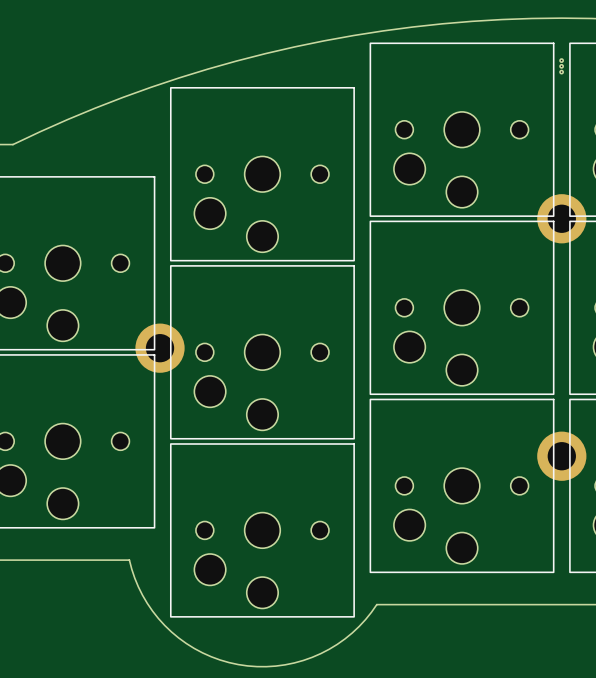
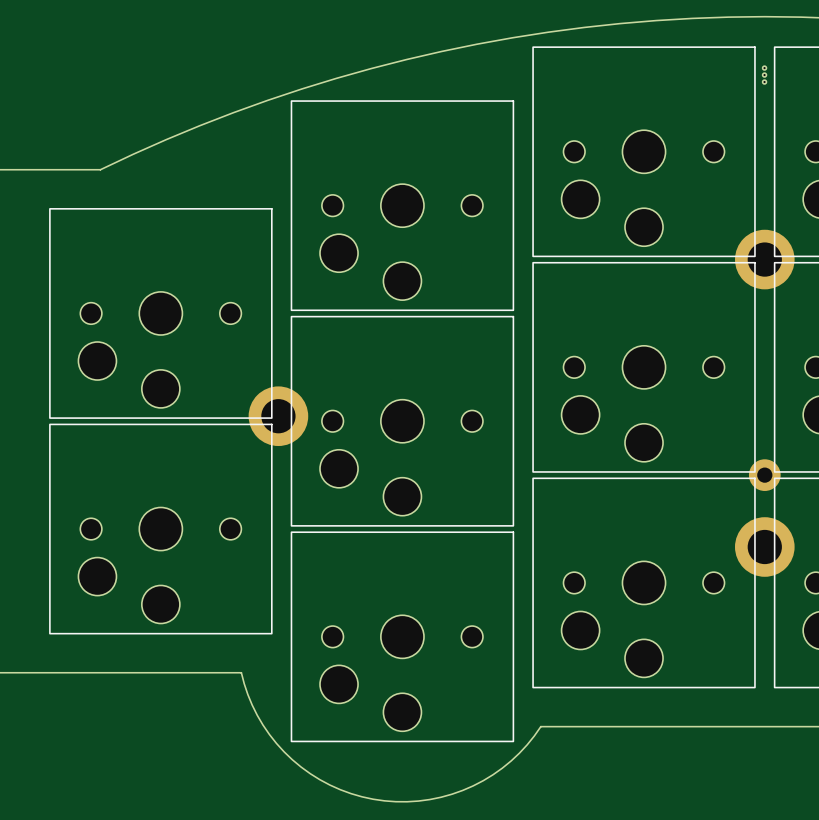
part: none -> (764, 475)

